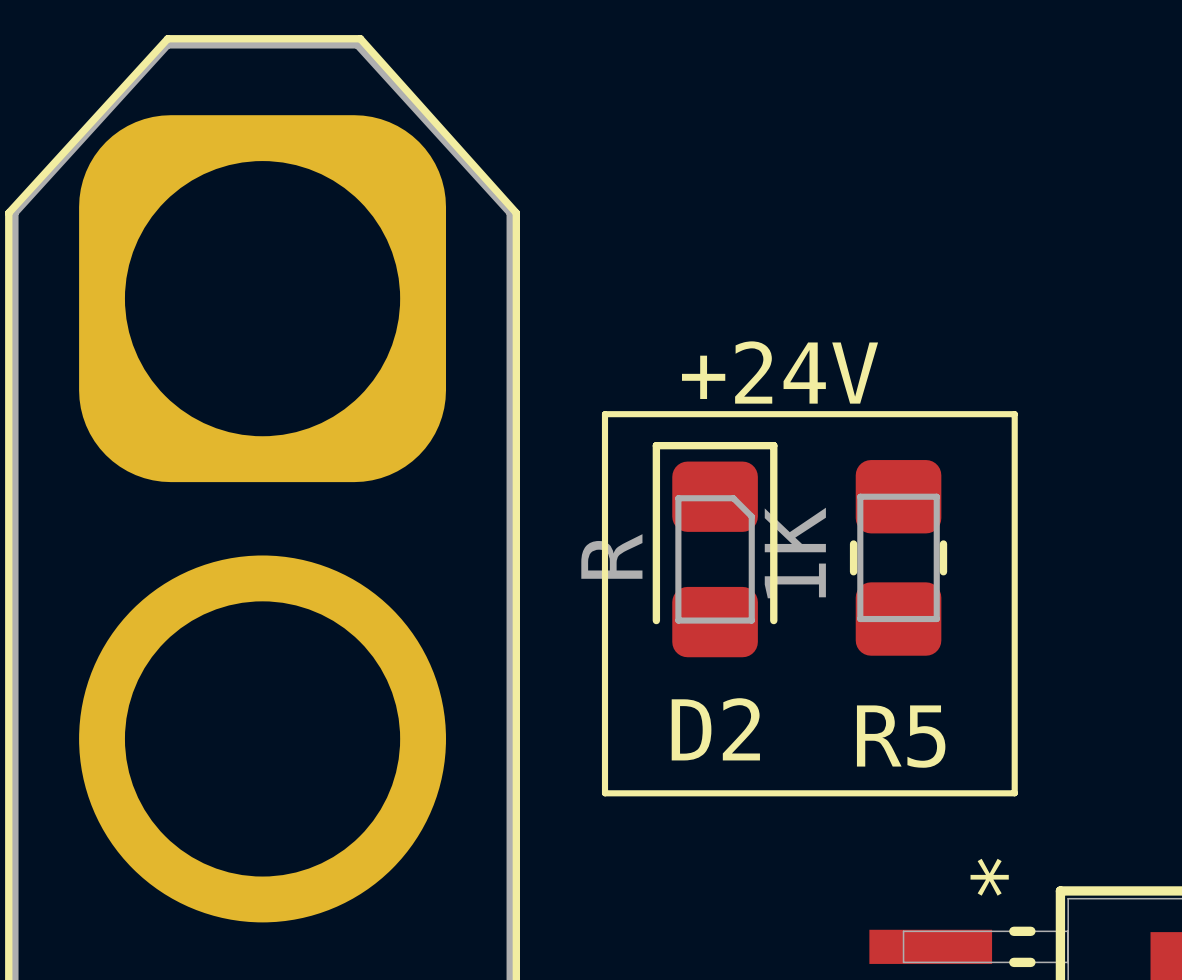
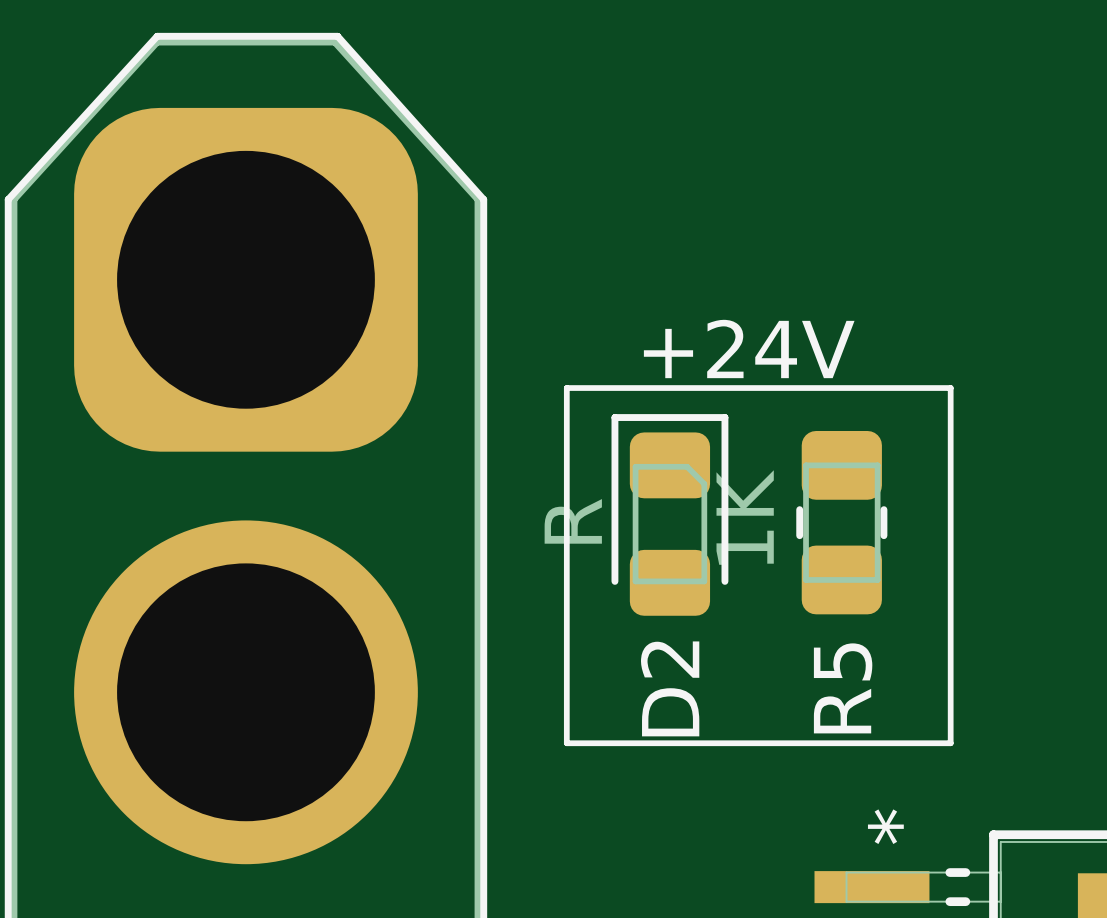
D2 name rotation: 0° (715, 729) -> 90° counterclockwise (670, 688)
R5 name rotation: 0° (901, 736) -> 90° counterclockwise (843, 688)
part text position: * (989, 877) -> * (885, 826)

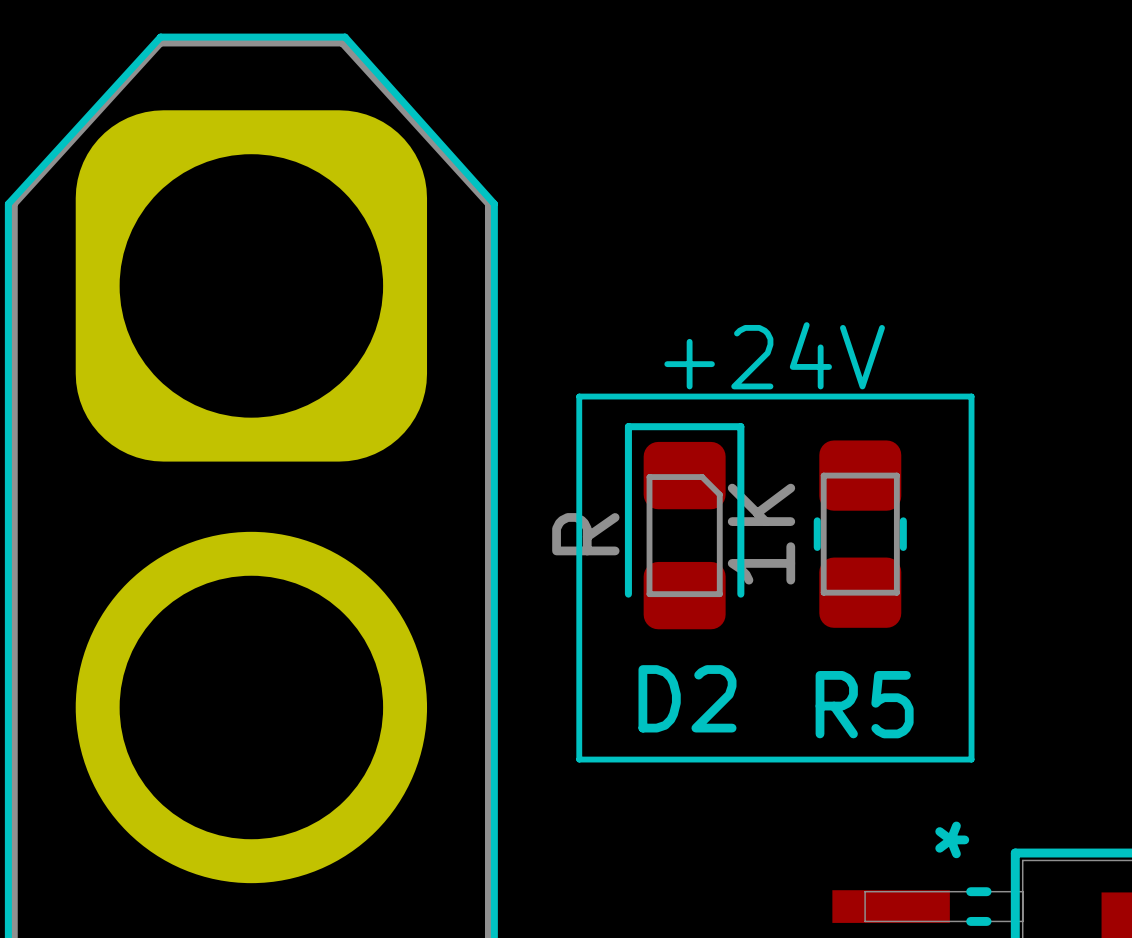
D2 name rotation: 0° (670, 688) -> 90° clockwise (687, 698)
R5 name rotation: 0° (843, 688) -> 90° clockwise (864, 704)
part text position: * (885, 826) -> * (952, 839)

